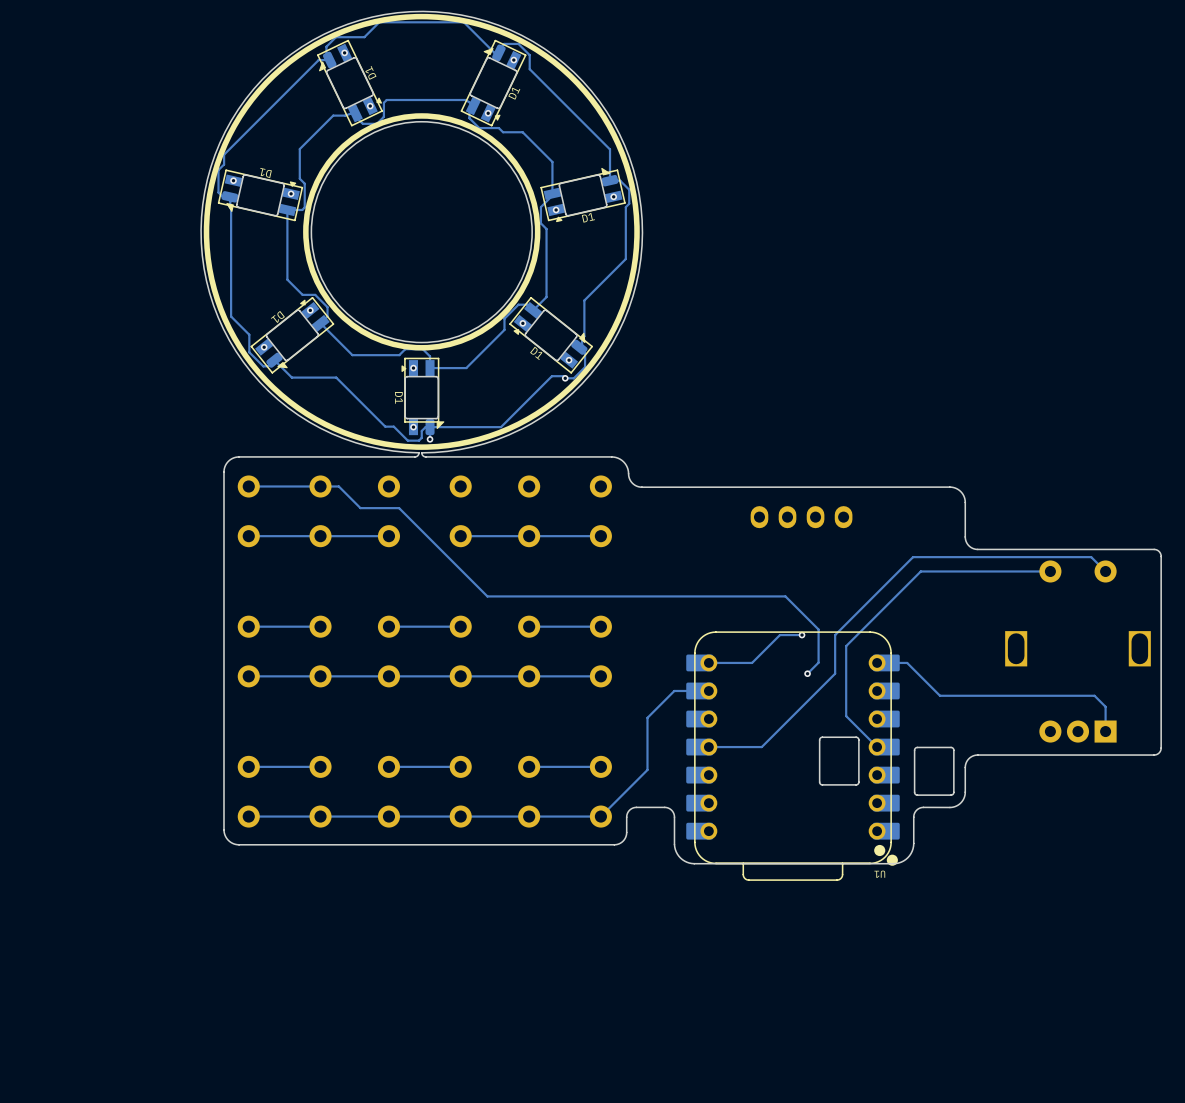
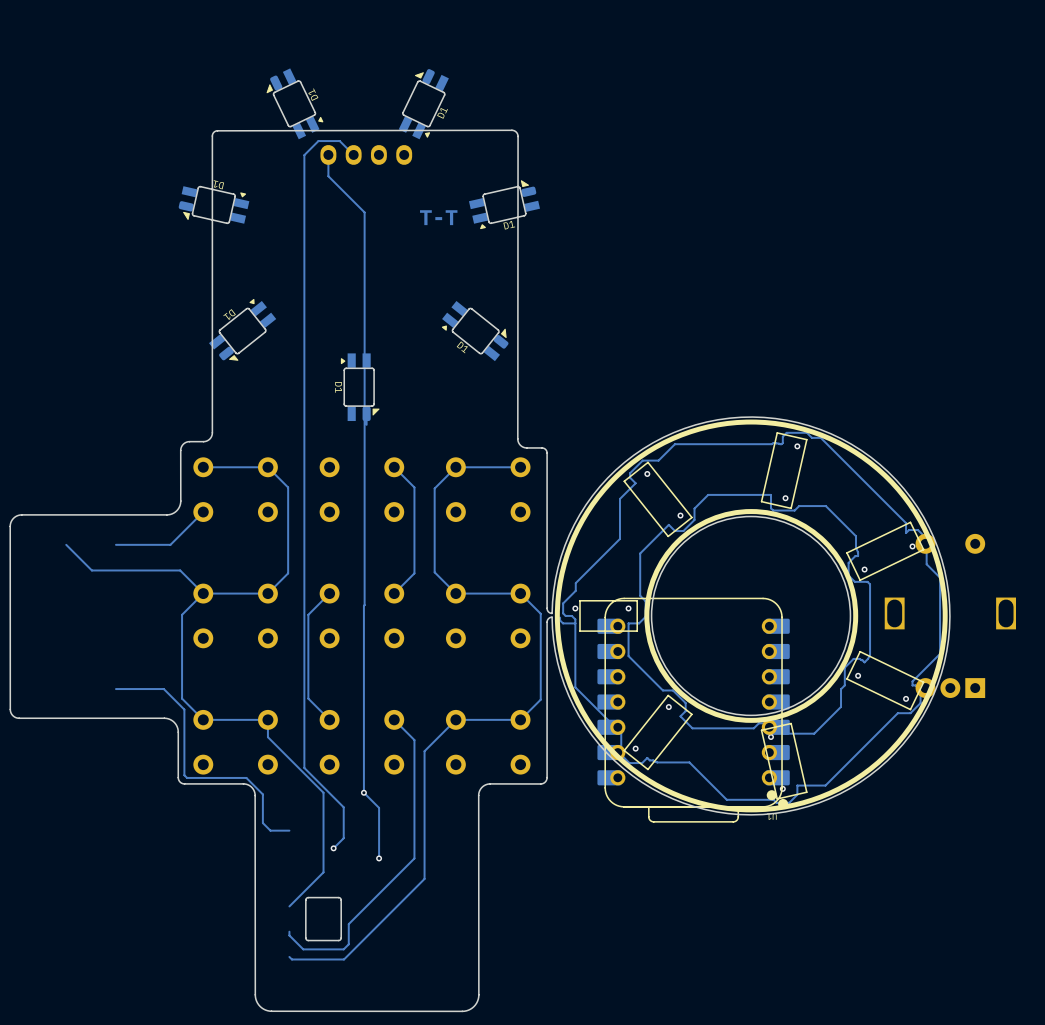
drawing: [203, 13, 640, 450] -> none
track: (463, 22) (379, 22) (364, 37) (335, 37) (326, 46) (326, 56) (329, 60) (318, 60) (224, 154) (224, 164) (218, 170) (218, 192) (222, 196) (231, 198) (231, 316) (249, 334) (249, 352) (263, 366) (268, 366) (274, 360) (291, 377) (336, 377) (385, 426) (393, 426) (407, 440) (418, 440) (421, 437) (421, 430) (425, 427) (501, 427) (551, 376) (573, 378) (585, 367) (585, 352) (579, 347) (584, 336) (584, 300) (625, 259) (625, 207) (629, 203) (629, 189) (620, 180) (610, 180) (610, 149) (529, 69) (529, 55) (518, 43) (504, 43) (498, 49) (498, 52) (494, 52) (463, 22) -> none
line: (348, 40) (382, 111) (351, 125) (317, 55) (348, 40) -> none
line: (495, 40) (525, 55) (491, 125) (461, 111) (495, 40) -> none
via: (344, 52) -> none
via: (513, 60) -> none
track: (465, 100) (386, 100) (383, 102) (383, 116) (376, 123) (362, 123) (355, 116) (355, 113) (333, 115) (299, 149) (299, 178) (304, 183) (304, 207) (302, 209) (287, 209) (287, 279) (302, 294) (315, 294) (327, 307) (327, 316) (320, 323) (352, 355) (399, 355) (405, 349) (422, 349) (430, 356) (430, 368) (466, 368) (504, 329) (504, 318) (518, 304) (527, 304) (533, 310) (546, 297) (546, 228) (540, 223) (540, 207) (552, 195) (552, 161) (522, 132) (503, 132) (498, 128) (479, 128) (469, 118) (469, 111) (473, 106) (465, 100) -> none
via: (370, 106) -> none
via: (488, 113) -> none
board edge: none -> (212, 136) (213, 132) (217, 130) (511, 130) (516, 132) (518, 136) (517, 440) (523, 447) (543, 448) (547, 452) (547, 610) (552, 613) (558, 567) (564, 545) (579, 514) (607, 477) (643, 448) (684, 428) (729, 418) (775, 418) (820, 429) (861, 450) (896, 480) (923, 517) (941, 559) (949, 605) (946, 651) (933, 695) (923, 715) (903, 743) (887, 760) (860, 782) (829, 798) (808, 806) (774, 813) (739, 814) (716, 811) (683, 803) (652, 788) (632, 775) (606, 753) (591, 735) (573, 706) (564, 684) (555, 651) (552, 617) (550, 617) (547, 622) (546, 780) (541, 783) (487, 784) (482, 787) (478, 792) (478, 994) (475, 1004) (470, 1009) (462, 1011) (271, 1011) (261, 1007) (257, 1003) (255, 994) (255, 795) (252, 788) (244, 784) (180, 782) (178, 777) (178, 730) (175, 723) (167, 718) (19, 718) (13, 716) (10, 710) (10, 526) (12, 519) (21, 514) (172, 513) (177, 509) (180, 502) (181, 446) (187, 441) (206, 441) (211, 435) (212, 136)
round board edge: [311, 121, 533, 343] -> none
track: none -> (328, 154) (328, 176) (364, 212) (363, 792) (379, 807) (379, 858)
track: none -> (353, 154) (339, 141) (318, 141) (304, 155) (304, 767) (343, 807) (343, 838) (333, 848)
part: none -> (366, 154)
line: (226, 170) (302, 187) (294, 220) (218, 203) (226, 170) -> none
line: (617, 170) (624, 203) (548, 220) (541, 187) (617, 170) -> none
via: (233, 180) -> none
via: (291, 193) -> none
via: (613, 196) -> none
text: none -> T-T (438, 217)
via: (556, 209) -> none
line: (312, 297) (251, 346) (272, 372) (333, 324) (312, 297) -> none
line: (531, 297) (592, 346) (571, 372) (510, 324) (531, 297) -> none
via: (310, 310) -> none
via: (522, 323) -> none
via: (264, 347) -> none
line: (438, 358) (404, 358) (404, 421) (438, 421) (438, 358) -> none
via: (569, 360) -> none
via: (413, 368) -> none
via: (565, 378) -> none
via: (413, 427) -> none
drawing: none -> [554, 419, 948, 813]
via: (430, 439) -> none
line: none -> (777, 432) (806, 439) (791, 508) (761, 501) (777, 432)
track: none -> (806, 432) (811, 437) (820, 437) (906, 523) (906, 533) (908, 530) (918, 530) (926, 538) (926, 564) (940, 577) (940, 653) (912, 681) (912, 685) (915, 685) (920, 690) (920, 703) (910, 713) (897, 713) (825, 785) (797, 785) (797, 794) (789, 802) (776, 802) (773, 799) (726, 799) (689, 762) (657, 762) (647, 757) (642, 763) (629, 763) (621, 754) (621, 733) (575, 687) (575, 619) (571, 615) (565, 615) (563, 613) (563, 603) (575, 590) (575, 583) (619, 538) (619, 498) (635, 483) (630, 477) (630, 473) (642, 460) (658, 460) (674, 444) (781, 444) (782, 436) (786, 432) (806, 432)
board edge: (414, 456) (237, 457) (227, 462) (223, 472) -> none
board edge: (611, 456) (623, 461) (627, 467) (630, 480) (640, 487) (953, 487) (959, 490) (964, 497) (965, 539) (968, 545) (974, 549) (1157, 550) (1161, 556) (1161, 748) -> none
board edge: (611, 456) (425, 456) (422, 454) (421, 452) (472, 446) (509, 434) (542, 416) (582, 383) (605, 353) (628, 308) (639, 271) (642, 232) (639, 194) (629, 157) (613, 122) (582, 81) (543, 48) (510, 29) (473, 17) (423, 11) (384, 14) (347, 24) (312, 40) (271, 70) (245, 98) (219, 142) (204, 191) (201, 230) (204, 268) (213, 305) (229, 340) (259, 381) (287, 407) (320, 428) (368, 446) (418, 452) (414, 456) -> none
via: none -> (797, 446)
board edge: (223, 472) (224, 829) (229, 841) (239, 844) (615, 844) (621, 842) (625, 837) (626, 815) (630, 809) (636, 807) (664, 807) (670, 809) (674, 814) (674, 844) -> none
line: none -> (647, 462) (691, 517) (668, 536) (624, 481) (647, 462)
track: (320, 486) (338, 486) (360, 508) (399, 508) (487, 596) (785, 596) (818, 629) (818, 662) (807, 673) -> (267, 467) (288, 487) (288, 573) (267, 593)
track: none -> (394, 467) (414, 487) (414, 573) (394, 593)
track: none -> (520, 467) (455, 467) (434, 488) (434, 572) (455, 593)
via: none -> (647, 473)
part: (801, 517) -> none
track: none -> (770, 494) (770, 508) (773, 510) (794, 510) (799, 506) (825, 506) (856, 536) (858, 556) (855, 556) (848, 562) (848, 575) (854, 581) (867, 581) (870, 584) (870, 655) (864, 662) (859, 658) (853, 658) (844, 667) (844, 685) (841, 689) (841, 706) (814, 733) (783, 733) (773, 723) (758, 723) (753, 728) (692, 728) (680, 716) (685, 711) (685, 703) (673, 690) (662, 690) (628, 656) (628, 623) (639, 623) (645, 616) (645, 601) (640, 595) (640, 553) (668, 524) (675, 531) (683, 531) (694, 519) (694, 508) (708, 494) (770, 494)
via: none -> (785, 498)
track: (388, 536) (248, 536) -> (115, 544) (170, 544) (203, 512)
track: (600, 536) (460, 536) -> none
round board edge: none -> [651, 516, 851, 716]
via: none -> (680, 515)
line: none -> (910, 522) (923, 549) (860, 580) (846, 552) (910, 522)
track: (1050, 571) (920, 571) (846, 646) (846, 716) (877, 747) -> none
track: (1105, 571) (1091, 557) (913, 557) (835, 635) (835, 673) (761, 747) (699, 747) -> none
track: none -> (66, 544) (91, 570) (180, 570) (203, 593) (182, 614) (182, 698) (203, 719)
via: none -> (912, 546)
via: none -> (864, 569)
track: (460, 626) (388, 626) -> (329, 719) (308, 698) (308, 614) (329, 593)
track: none -> (520, 593) (540, 613) (540, 699) (520, 719)
line: none -> (637, 600) (580, 600) (580, 631) (637, 631) (637, 600)
track: (802, 635) (779, 635) (752, 662) (708, 662) -> none
via: (802, 635) -> none
via: none -> (575, 608)
via: none -> (628, 608)
track: none -> (560, 617) (563, 623) (575, 623)
track: (886, 662) (907, 662) (940, 695) (1094, 695) (1105, 706) (1105, 731) -> none
via: (807, 673) -> none
track: (600, 676) (248, 676) -> none
track: (699, 690) (674, 690) (647, 717) (647, 769) (600, 816) (248, 816) -> none
line: none -> (860, 651) (923, 682) (910, 709) (846, 678) (860, 651)
via: none -> (858, 675)
track: none -> (115, 689) (163, 689) (184, 709) (184, 775) (187, 777) (246, 777) (262, 794) (262, 823) (270, 830) (289, 830)
board edge: (856, 737) (820, 738) (820, 784) (858, 783) (858, 740) (856, 737) -> none
line: none -> (668, 695) (624, 750) (647, 769) (691, 714) (668, 695)
via: none -> (906, 698)
board edge: (951, 747) (915, 748) (915, 794) (953, 794) (953, 750) (951, 747) -> none
board edge: (1161, 748) (1159, 752) (1154, 755) (972, 756) (965, 764) (965, 793) (961, 801) (953, 807) (922, 807) (916, 810) (913, 815) (912, 851) (905, 859) (896, 863) (691, 863) (678, 856) (674, 844) -> none
via: none -> (668, 707)
track: none -> (267, 719) (267, 737) (323, 792) (323, 872) (289, 906)
track: (460, 766) (388, 766) -> (394, 719) (414, 740) (414, 858) (348, 924) (348, 944) (343, 949) (303, 949) (289, 935) (289, 931)
track: none -> (455, 719) (424, 751) (424, 878) (344, 959) (291, 959) (289, 956)
line: none -> (791, 723) (806, 792) (777, 798) (761, 730) (791, 723)
via: none -> (770, 737)
via: none -> (635, 748)
via: none -> (782, 788)
via: none -> (363, 792)
via: none -> (333, 848)
via: none -> (379, 858)
board edge: none -> (338, 897) (306, 898) (306, 940) (340, 939) (341, 900) (338, 897)

